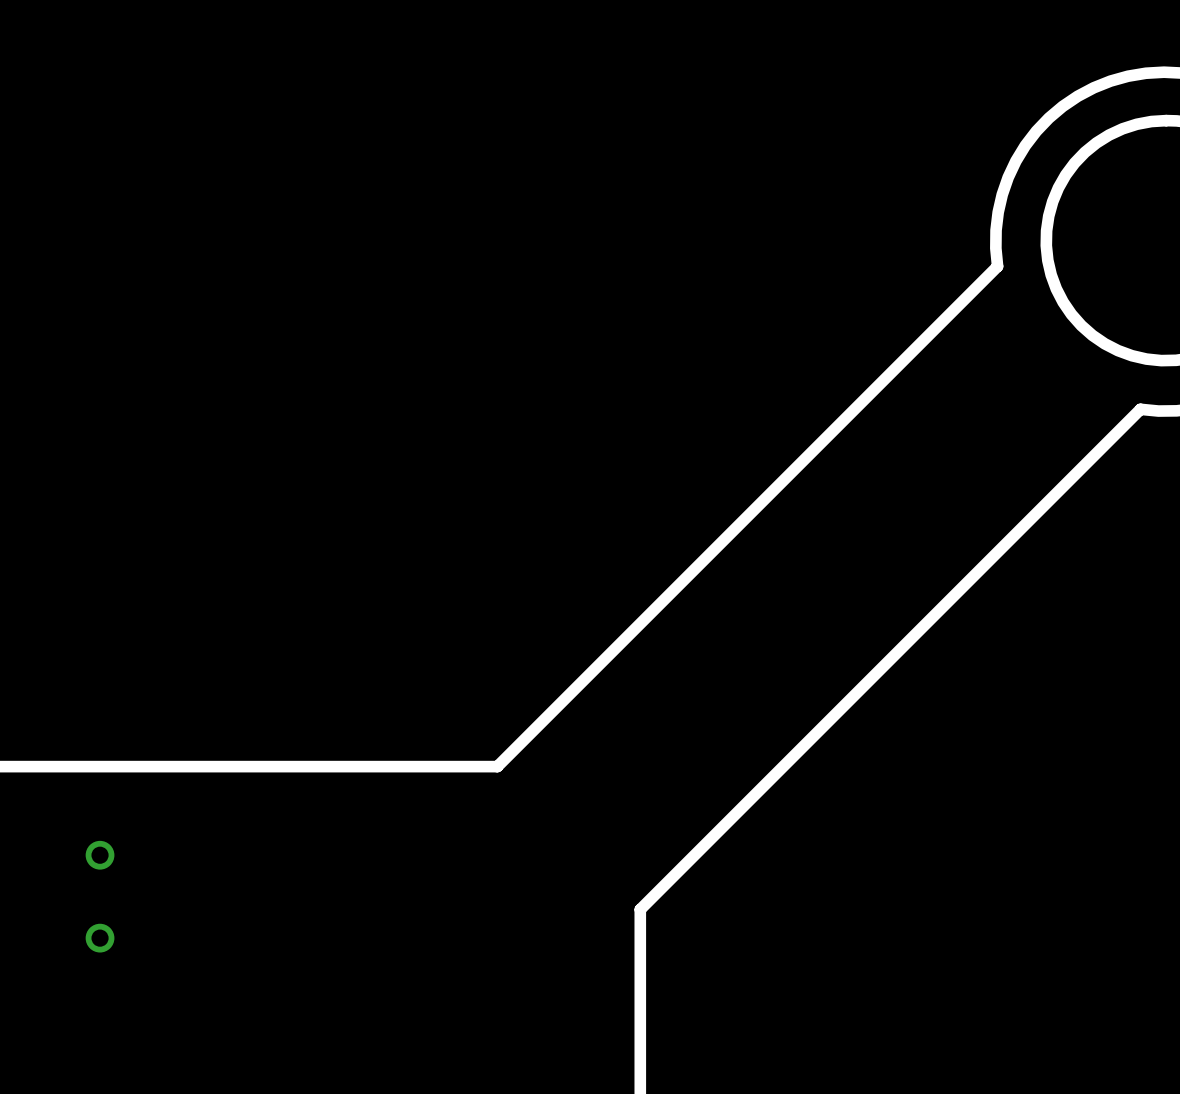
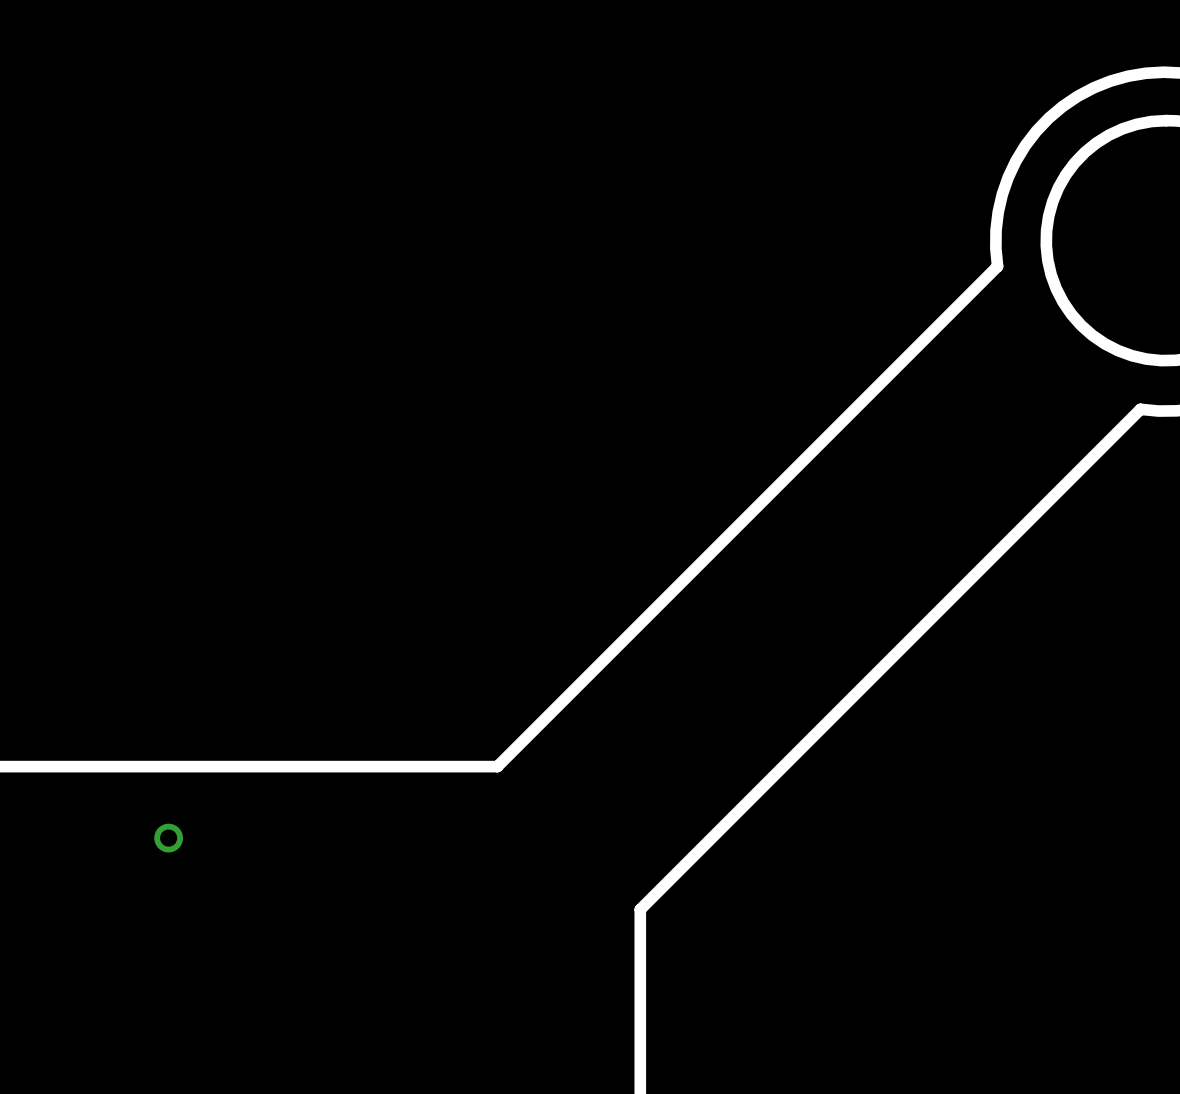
via: none -> (168, 838)
via: (100, 855) -> none
via: (100, 938) -> none

